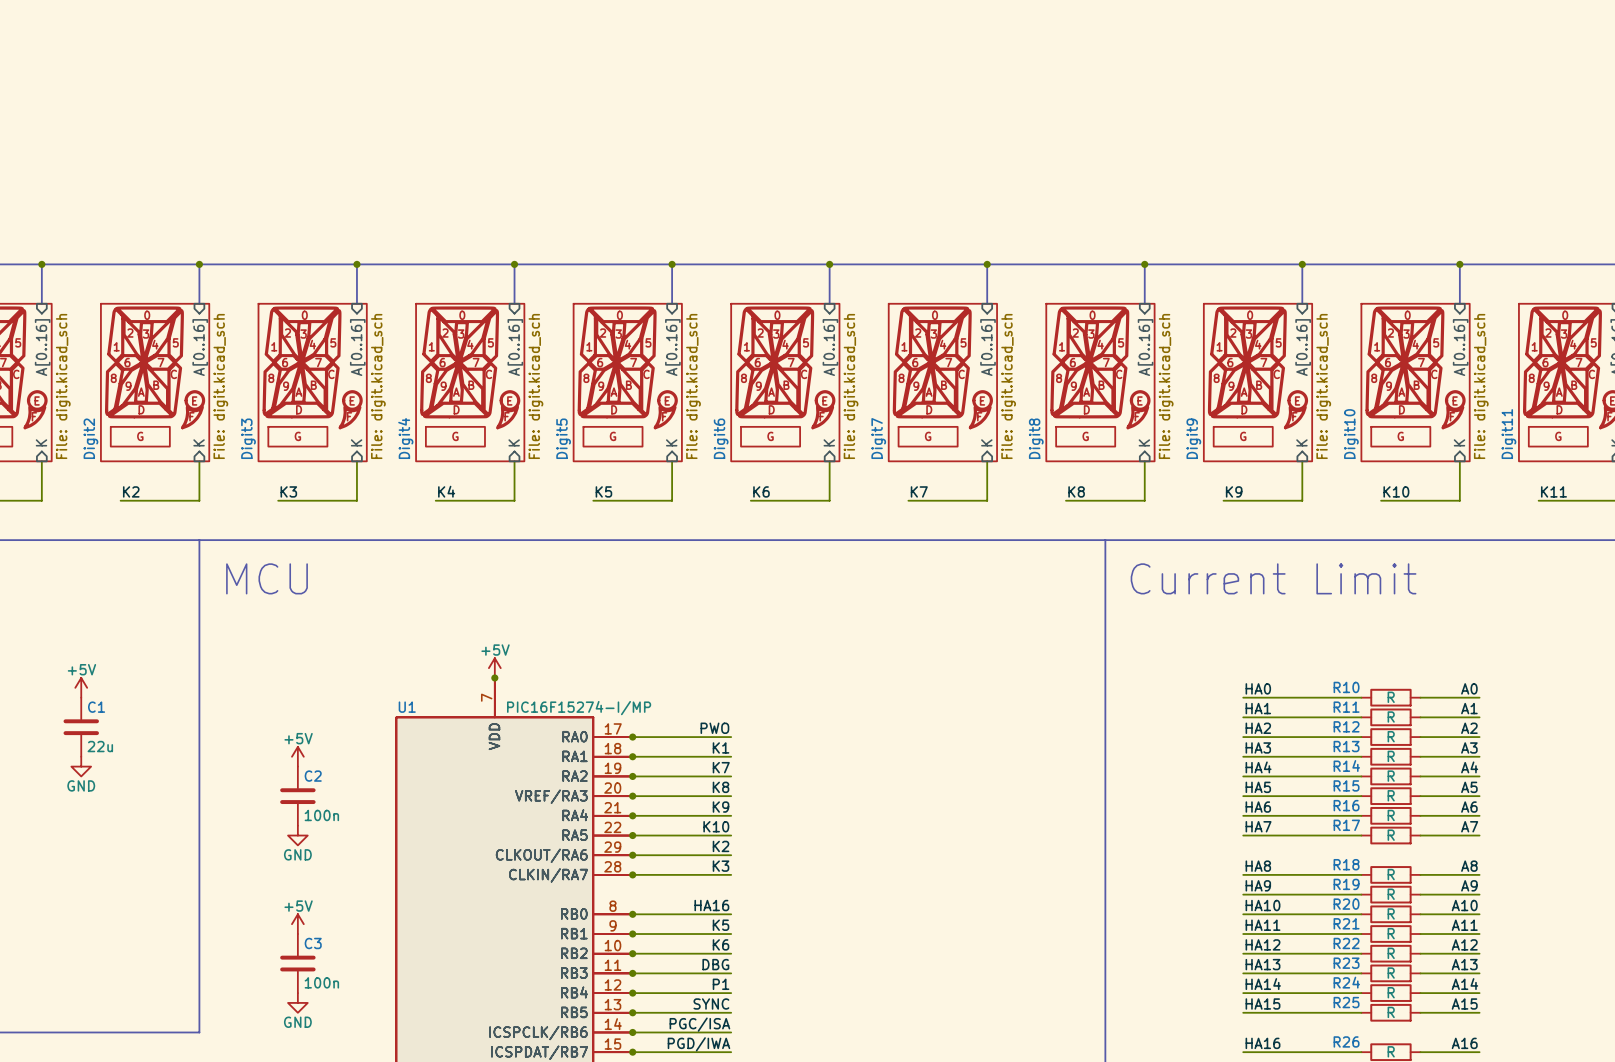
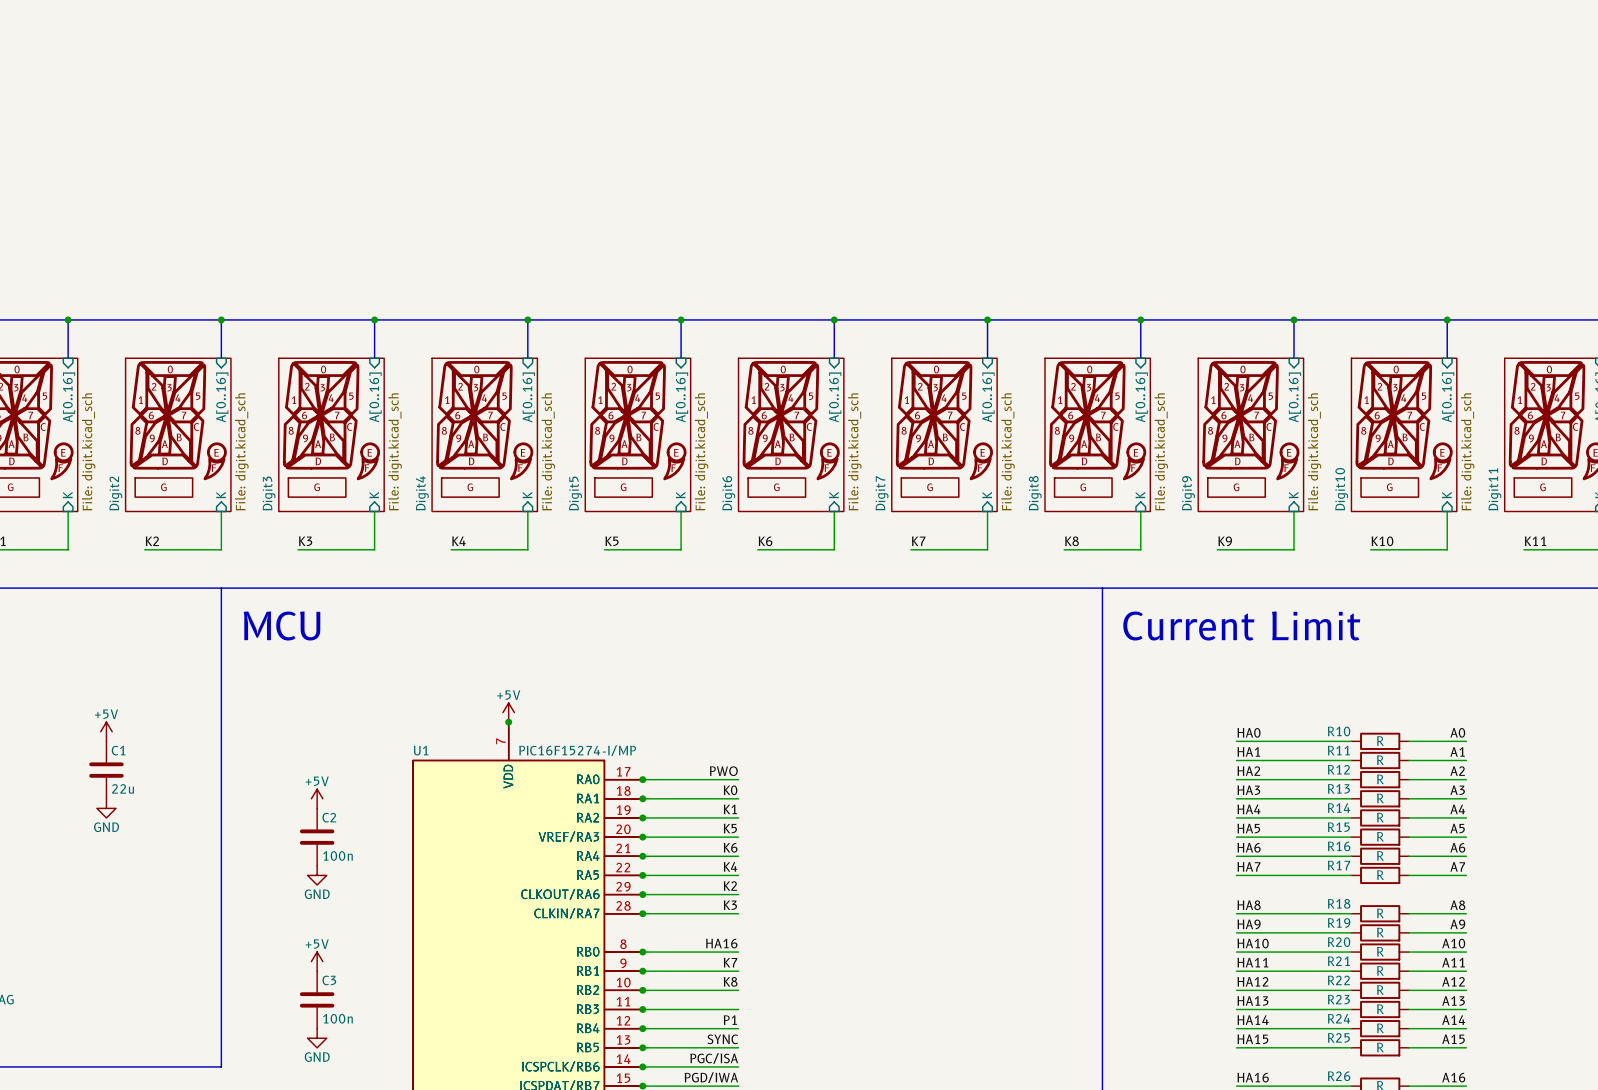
label: K1 (721, 747) -> K0 (730, 790)
label: K7 (721, 767) -> K1 (730, 809)
label: K8 (721, 787) -> K5 (730, 828)
label: K9 (721, 807) -> K6 (730, 847)
label: K10 (716, 826) -> K4 (730, 866)
label: K5 (721, 925) -> K7 (730, 962)
label: K6 (721, 944) -> K8 (730, 981)
label: DBG (715, 964) -> none

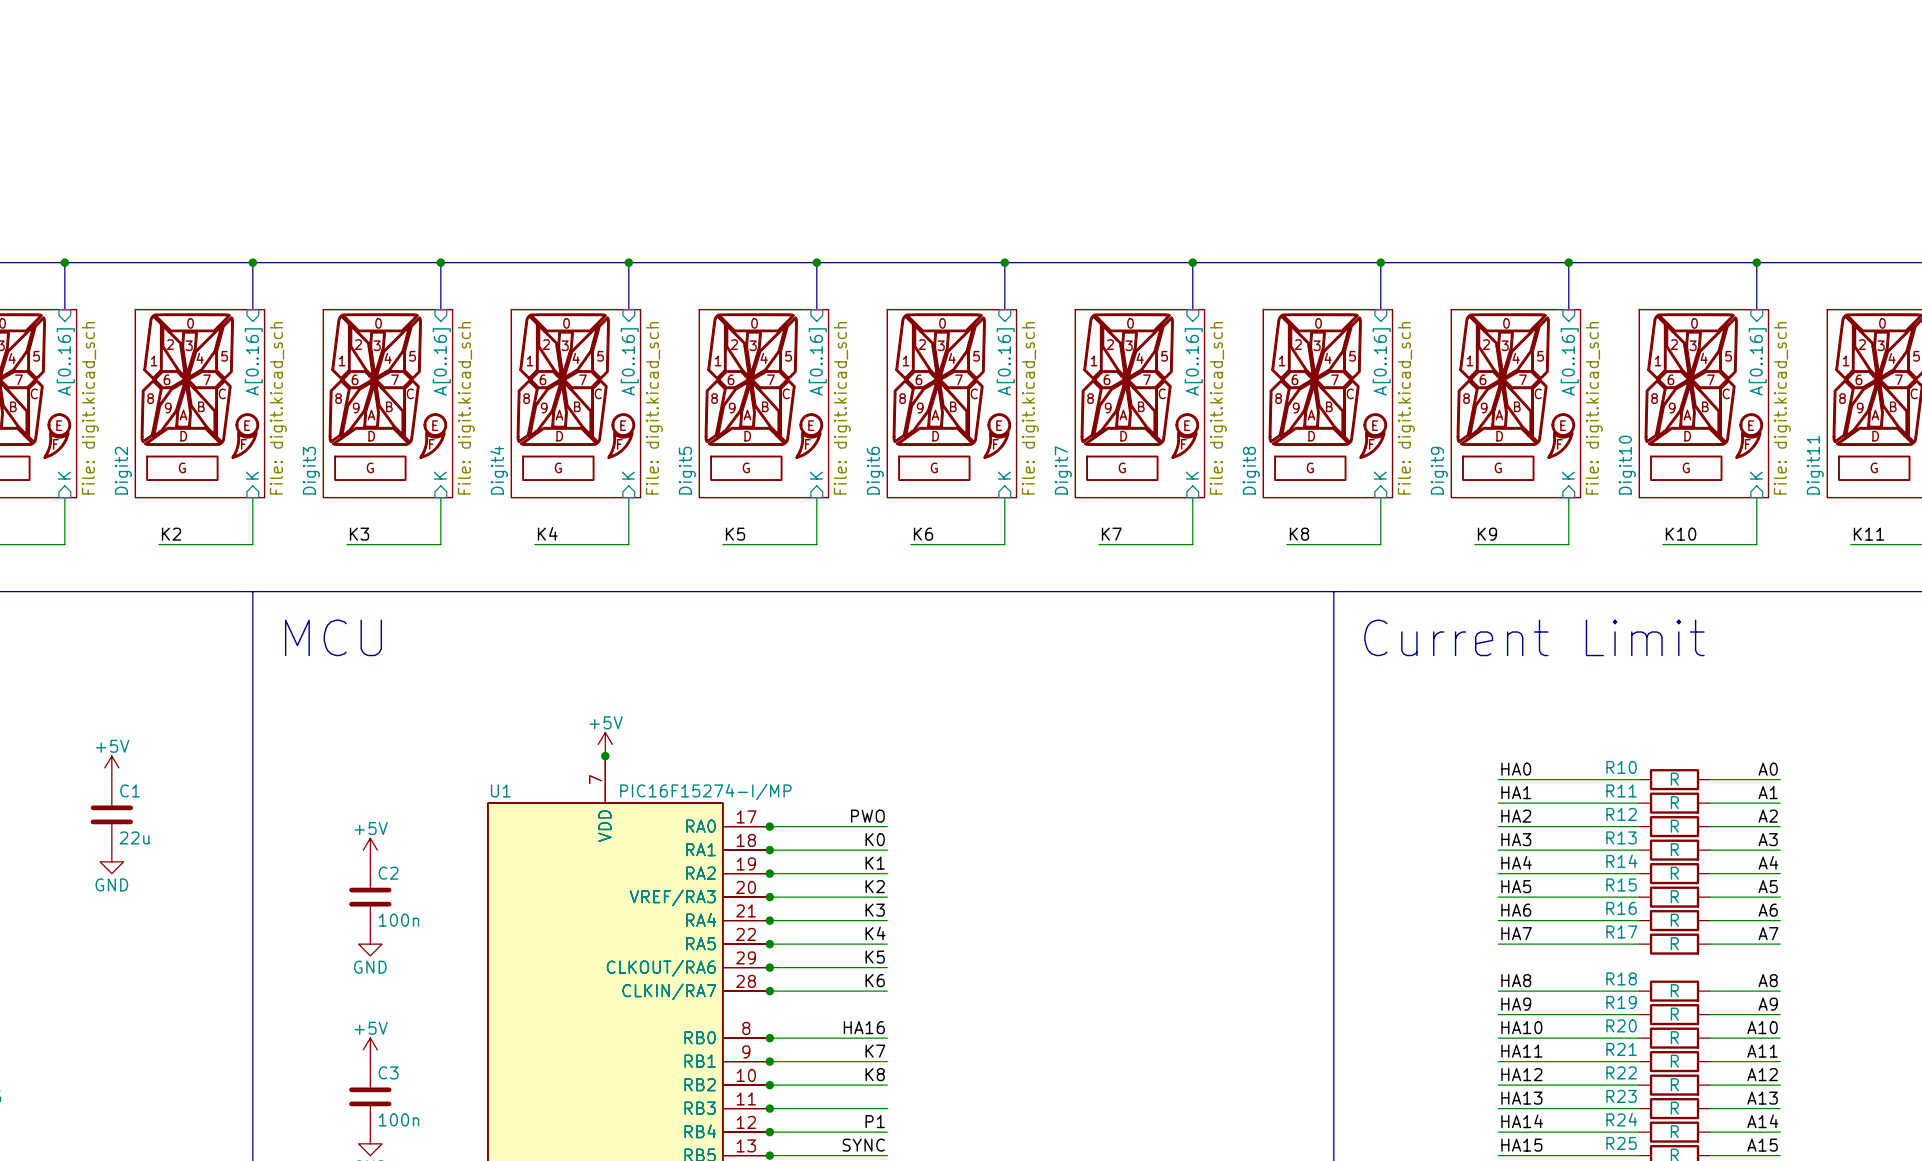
label: K5 (730, 828) -> K2 (875, 886)
label: K6 (730, 847) -> K3 (875, 910)
label: K2 (730, 886) -> K5 (875, 957)
label: K3 (730, 905) -> K6 (875, 980)

